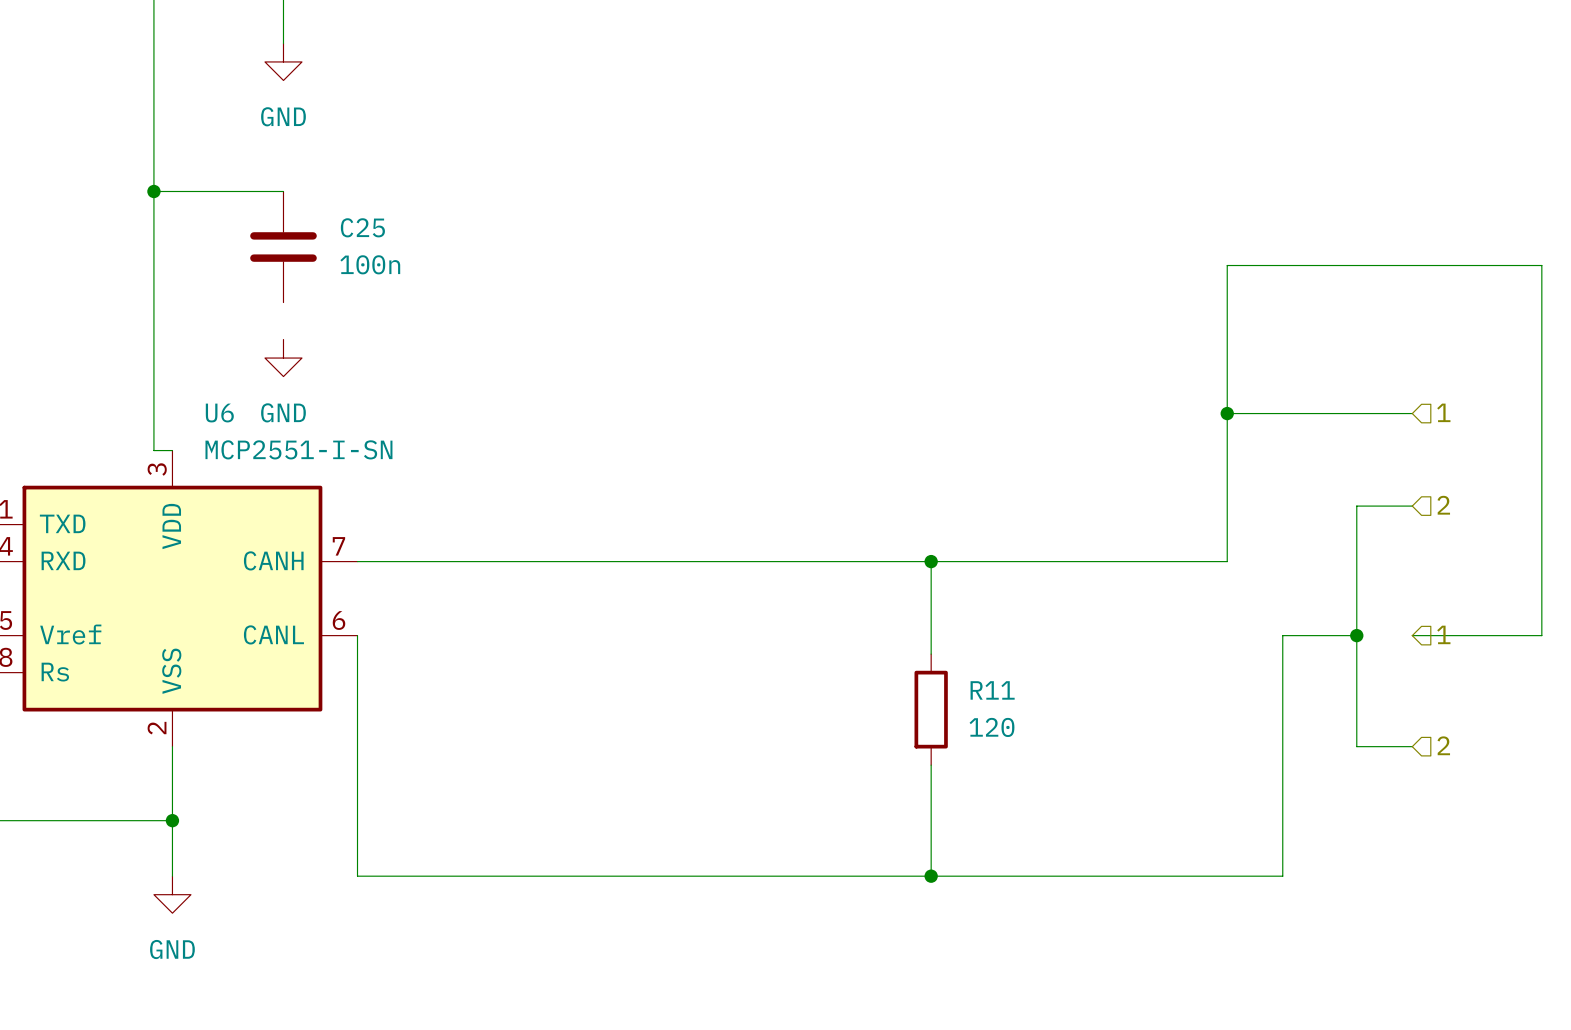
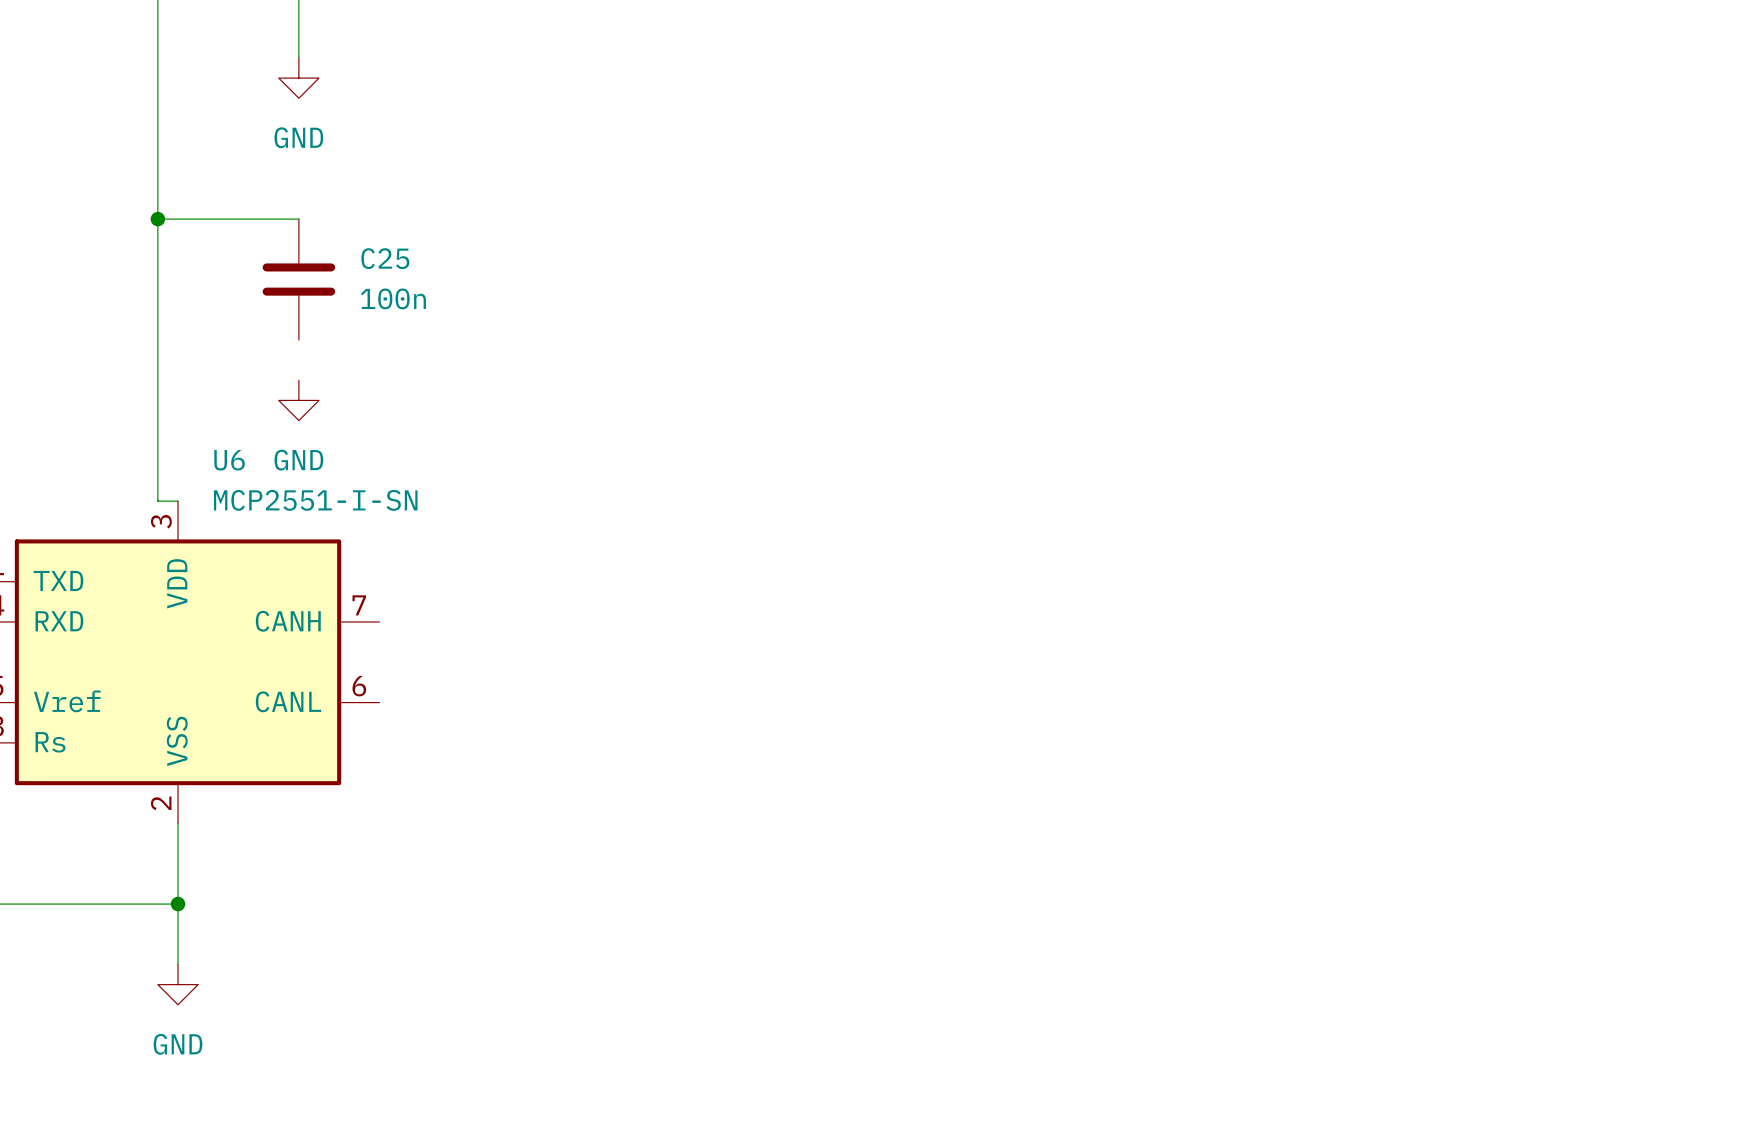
hierarchical label: 1 (1443, 412) -> none
wire: (1227, 413) (1412, 413) -> none
junction: (1227, 413) -> none
hierarchical label: 2 (1443, 505) -> none
wire: (1412, 506) (1356, 506) (1356, 746) (1412, 746) -> none
wire: (357, 561) (1227, 561) (1227, 265) (1541, 265) (1541, 635) (1412, 635) -> none
wire: (931, 561) (931, 654) -> none
junction: (931, 561) -> none
hierarchical label: 1 (1443, 634) -> none
wire: (357, 635) (357, 876) (1282, 876) (1282, 635) (1356, 635) -> none
junction: (1356, 635) -> none
R11: 120 (931, 709) -> none
hierarchical label: 2 (1443, 745) -> none
wire: (931, 765) (931, 876) -> none
junction: (931, 876) -> none

